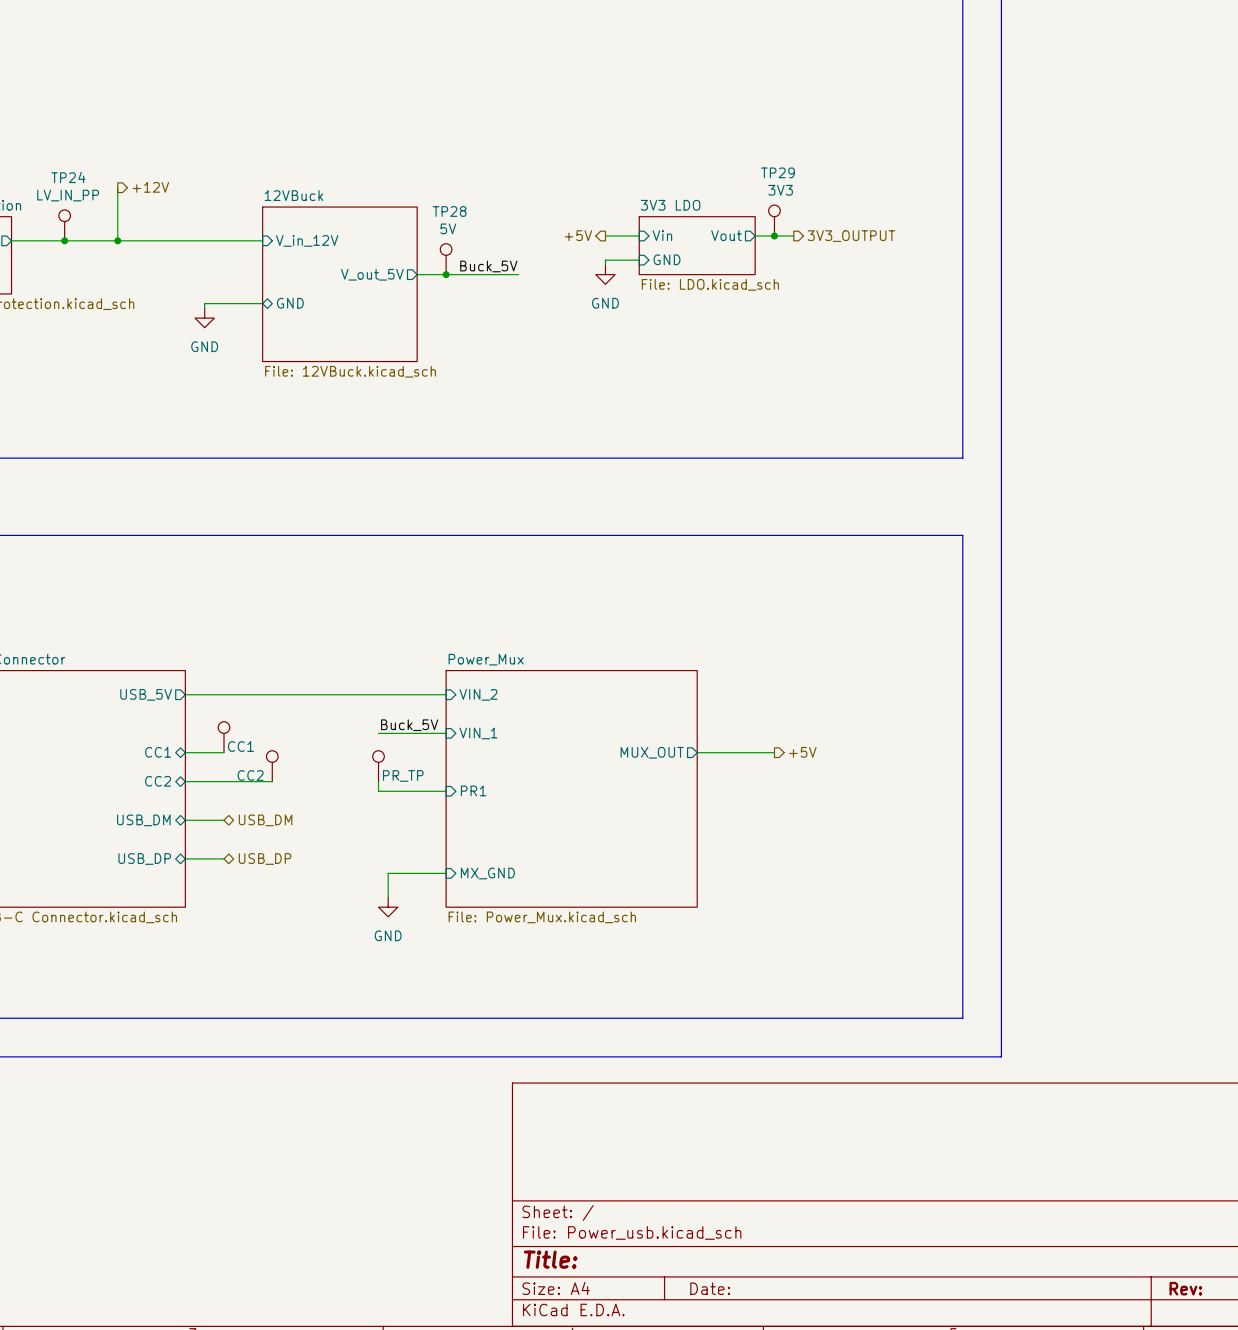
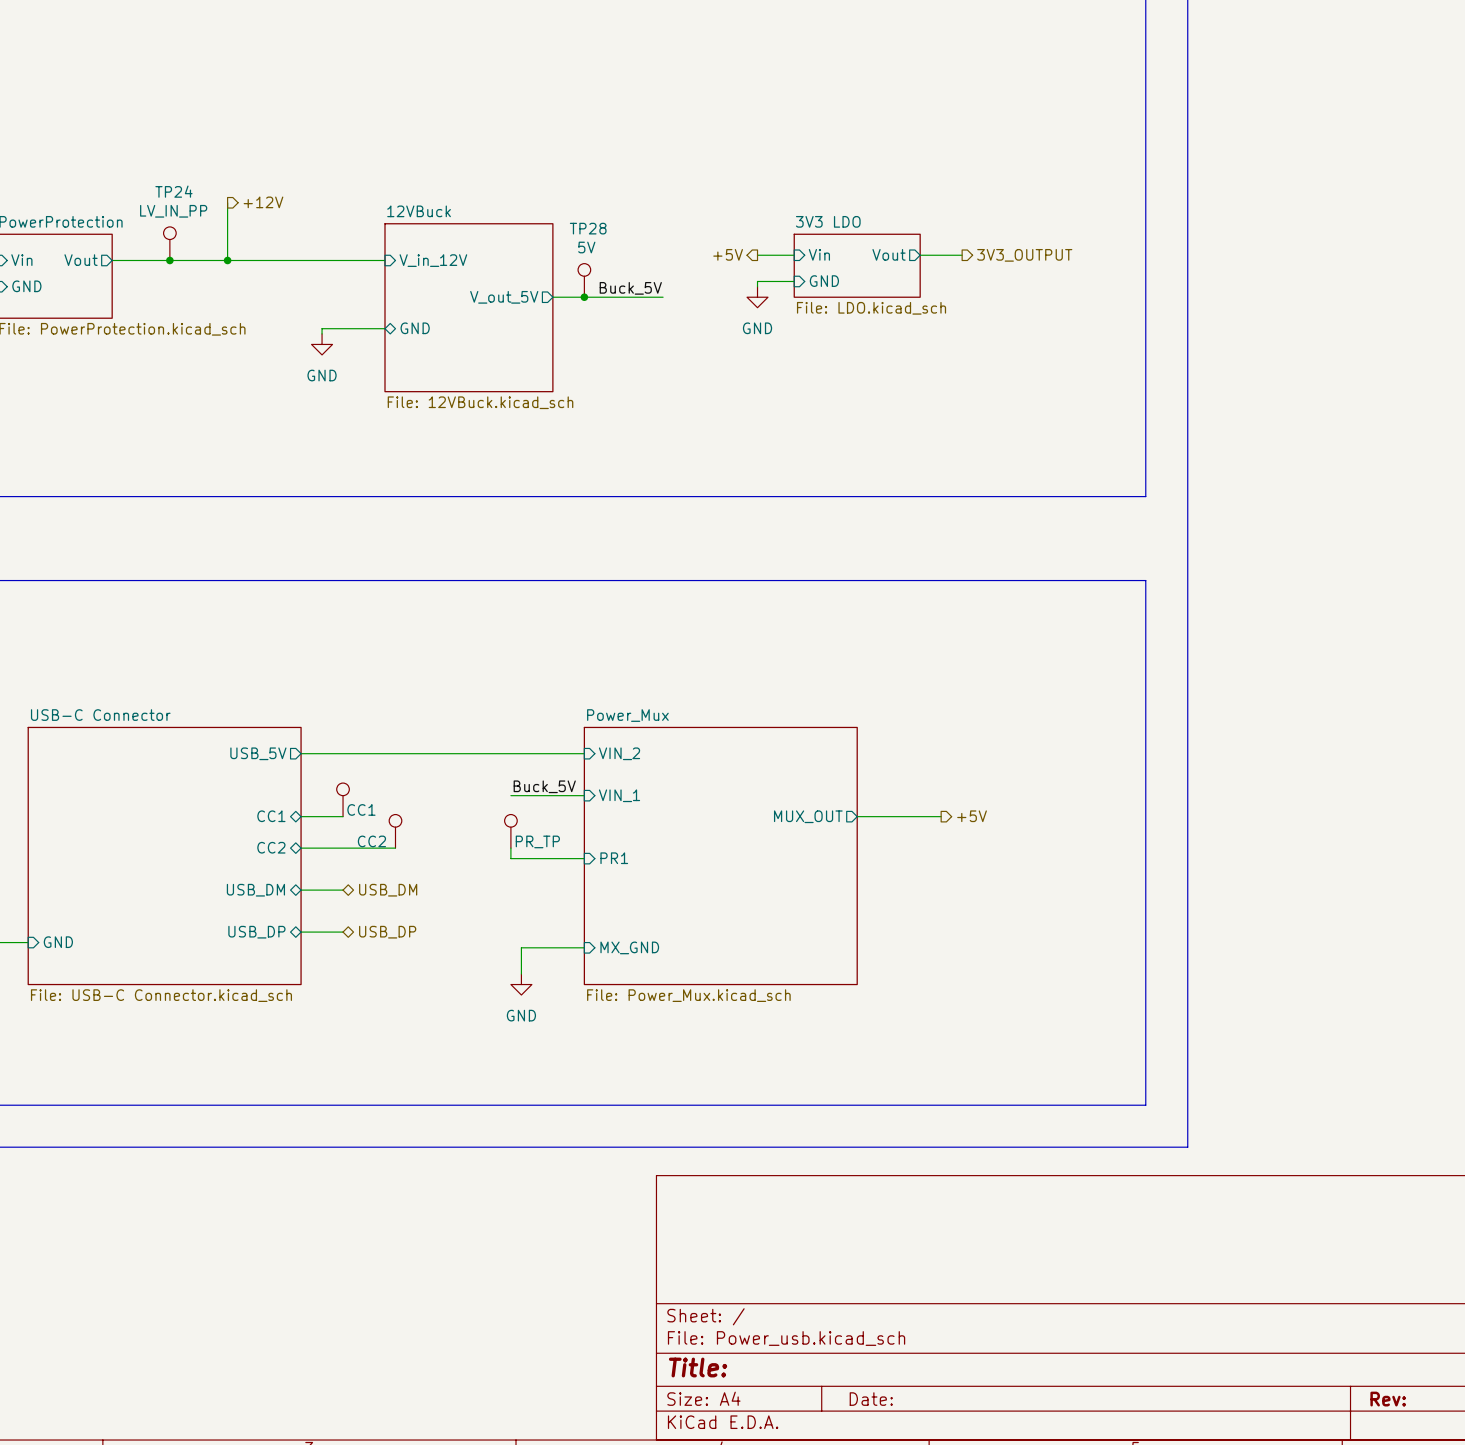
TP29: 3V3 (774, 220) -> none
junction: (774, 236) -> none

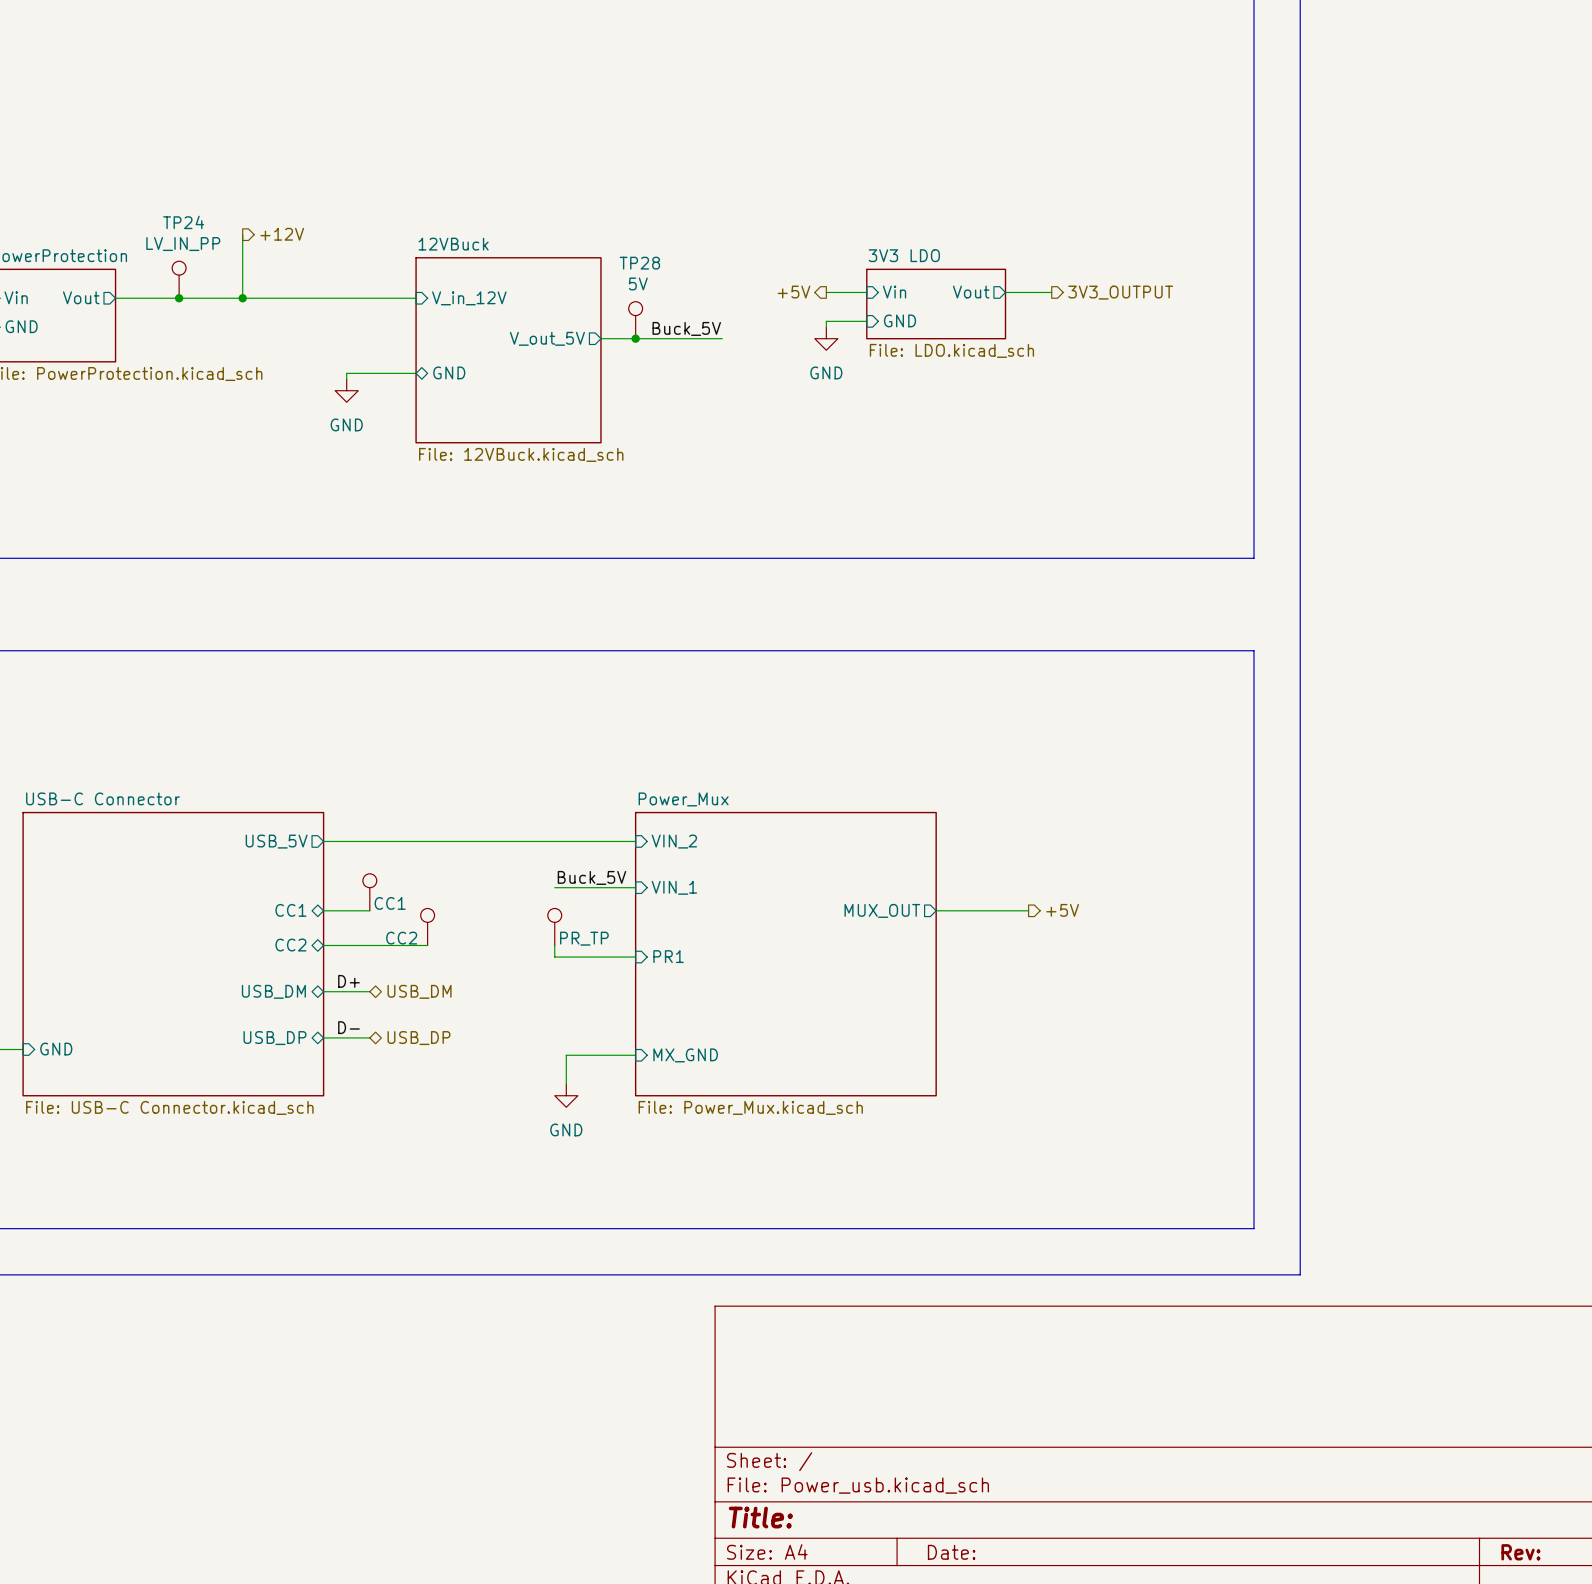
label: none -> D+ (348, 981)
label: none -> D- (348, 1027)

